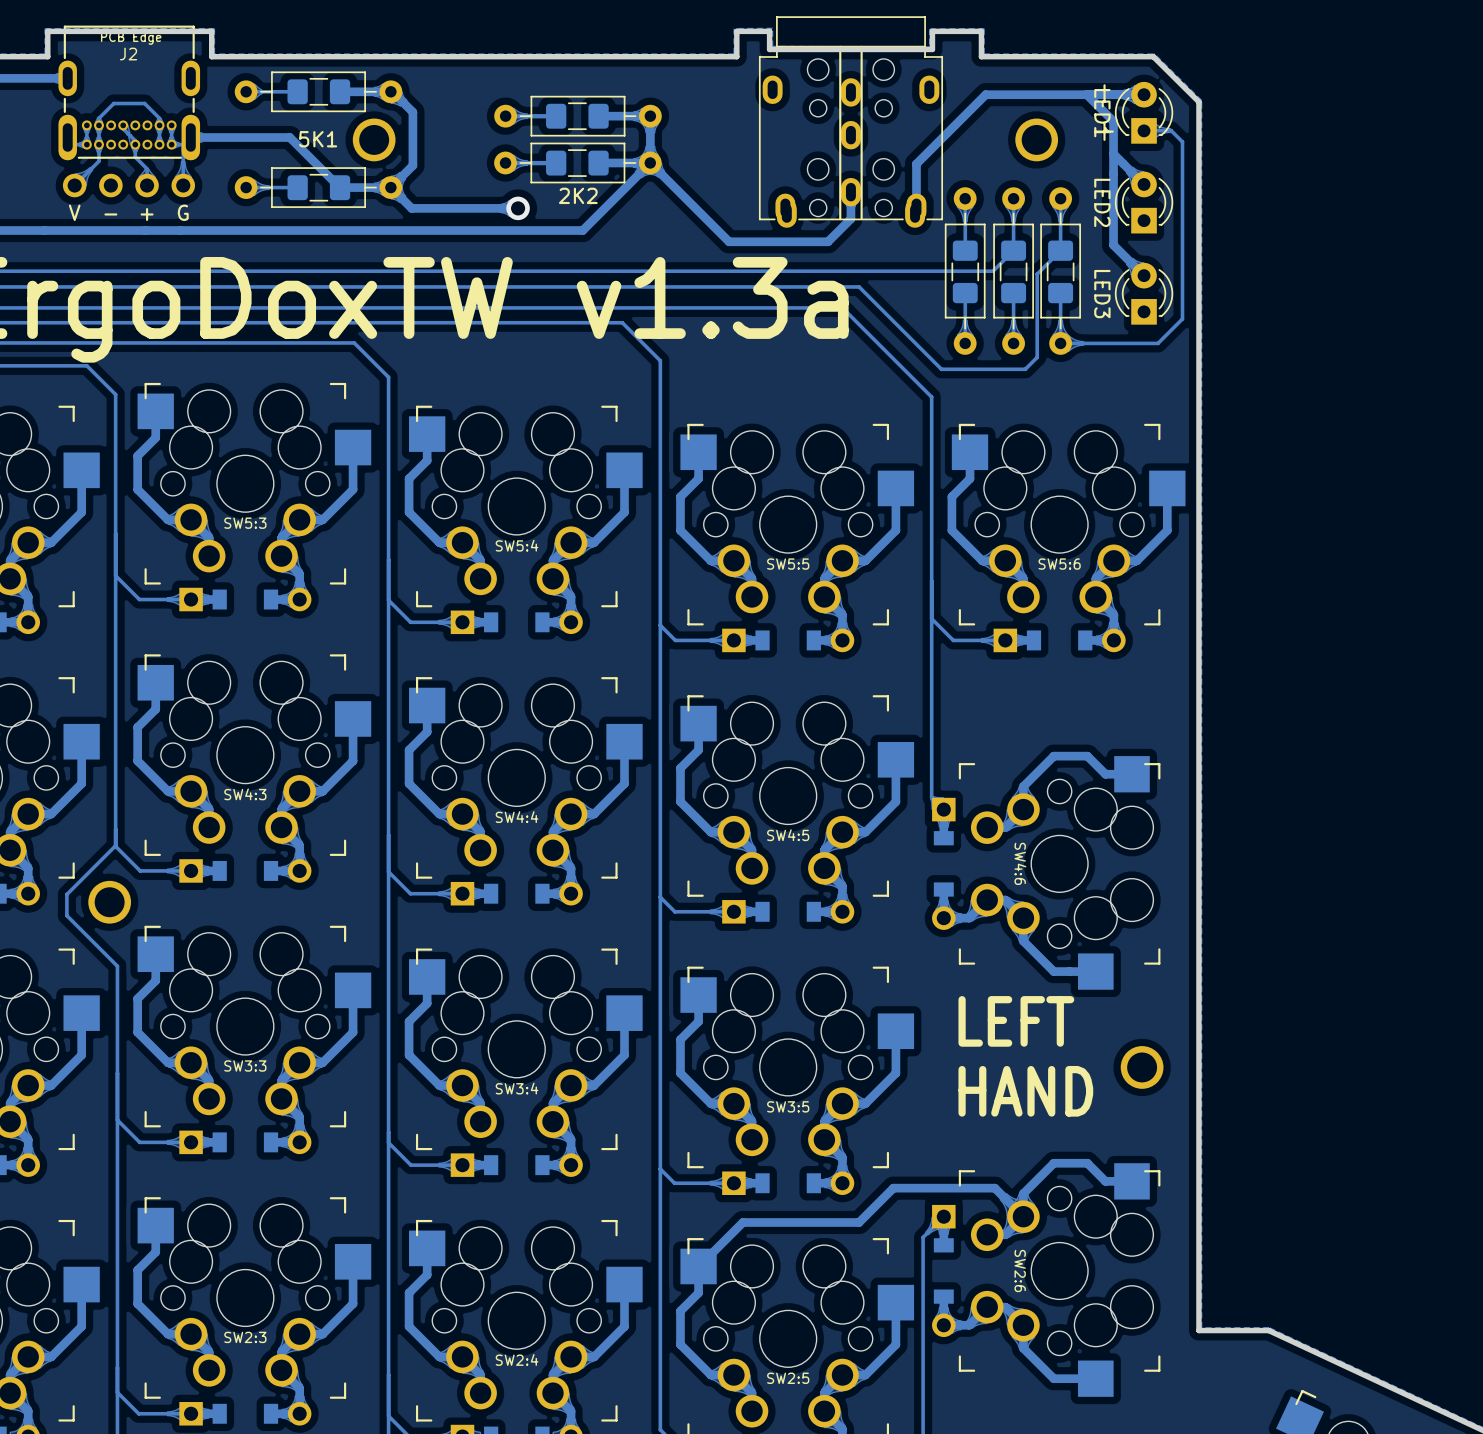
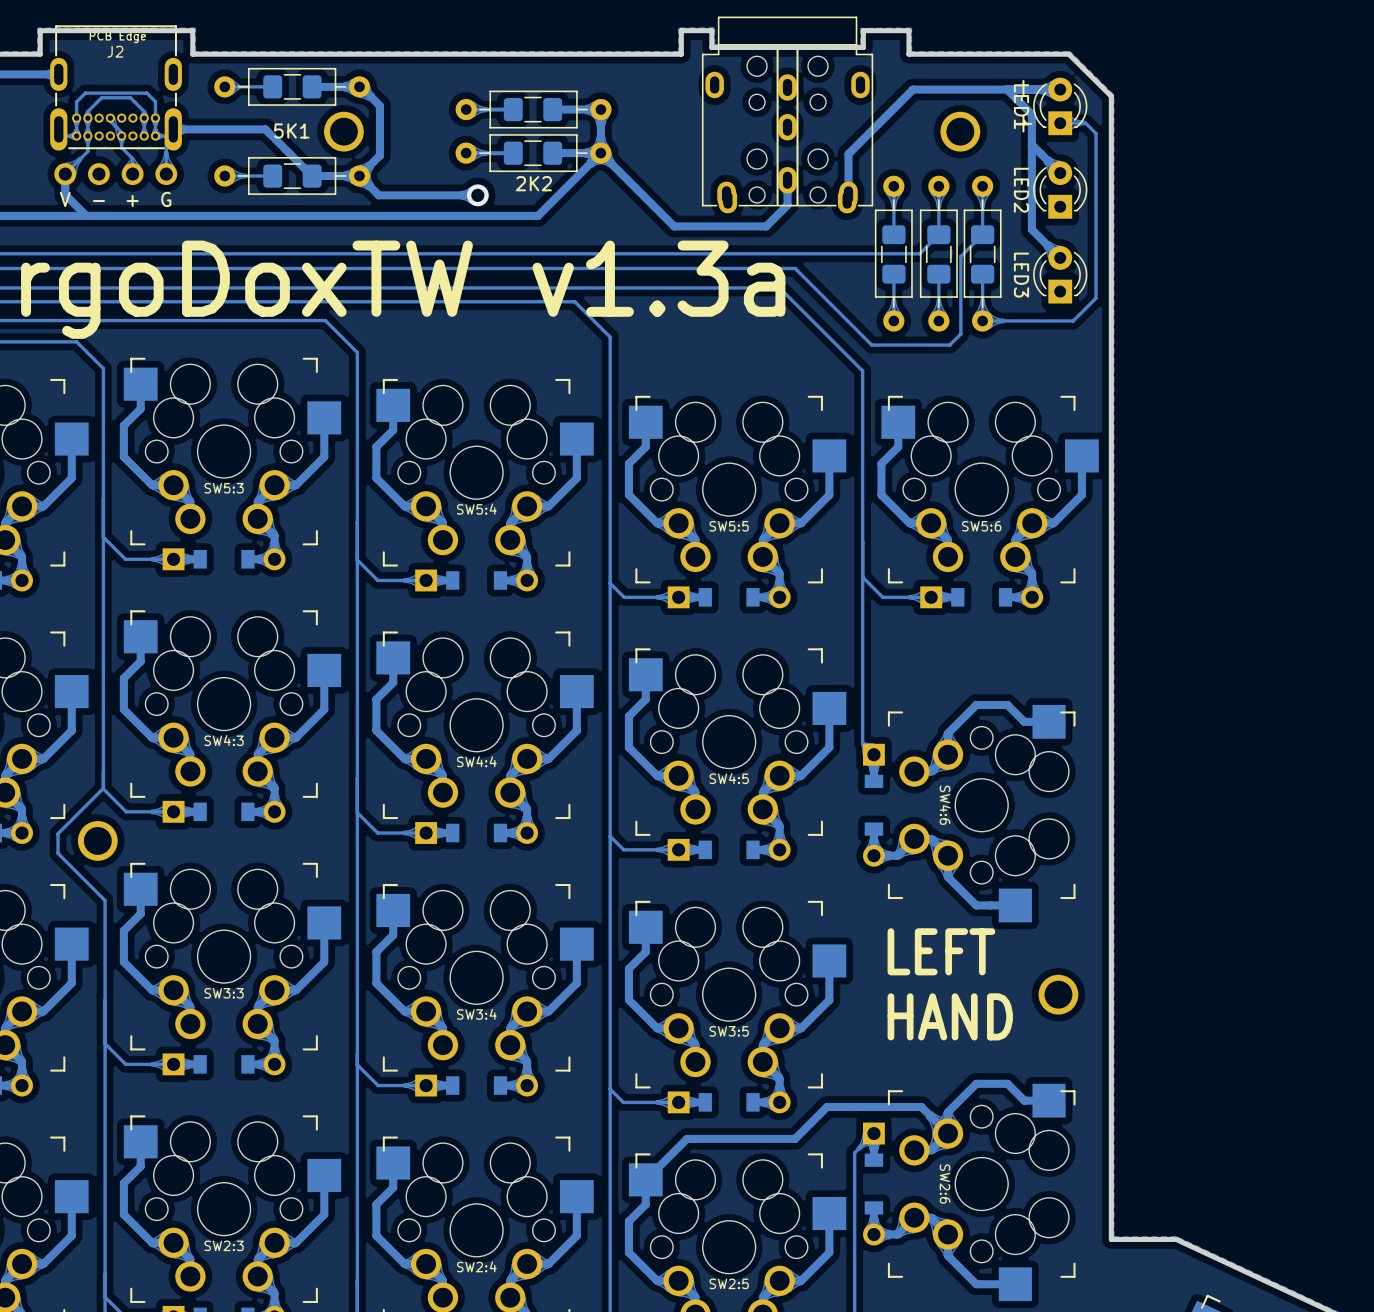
track: none -> (155, 118) (155, 101) (146, 93) (85, 93) (76, 101) (76, 118)
track: none -> (65, 174) (65, 194) (86, 215)

